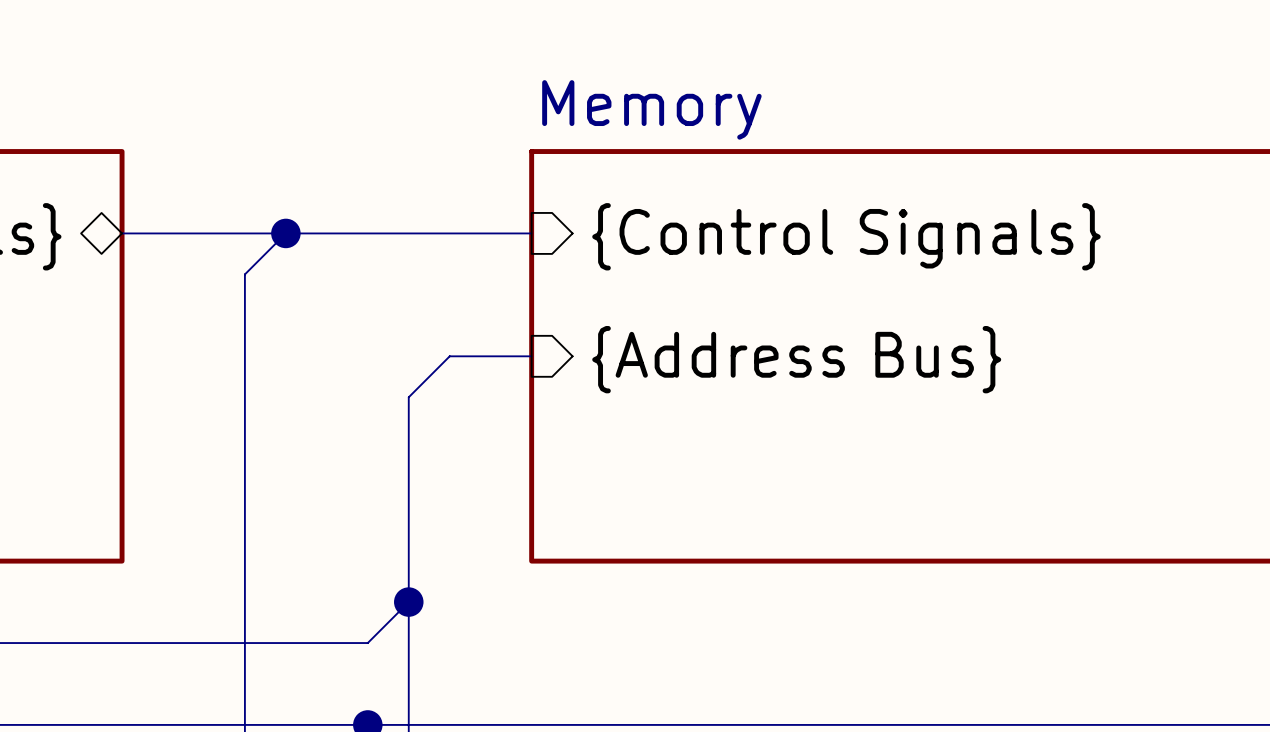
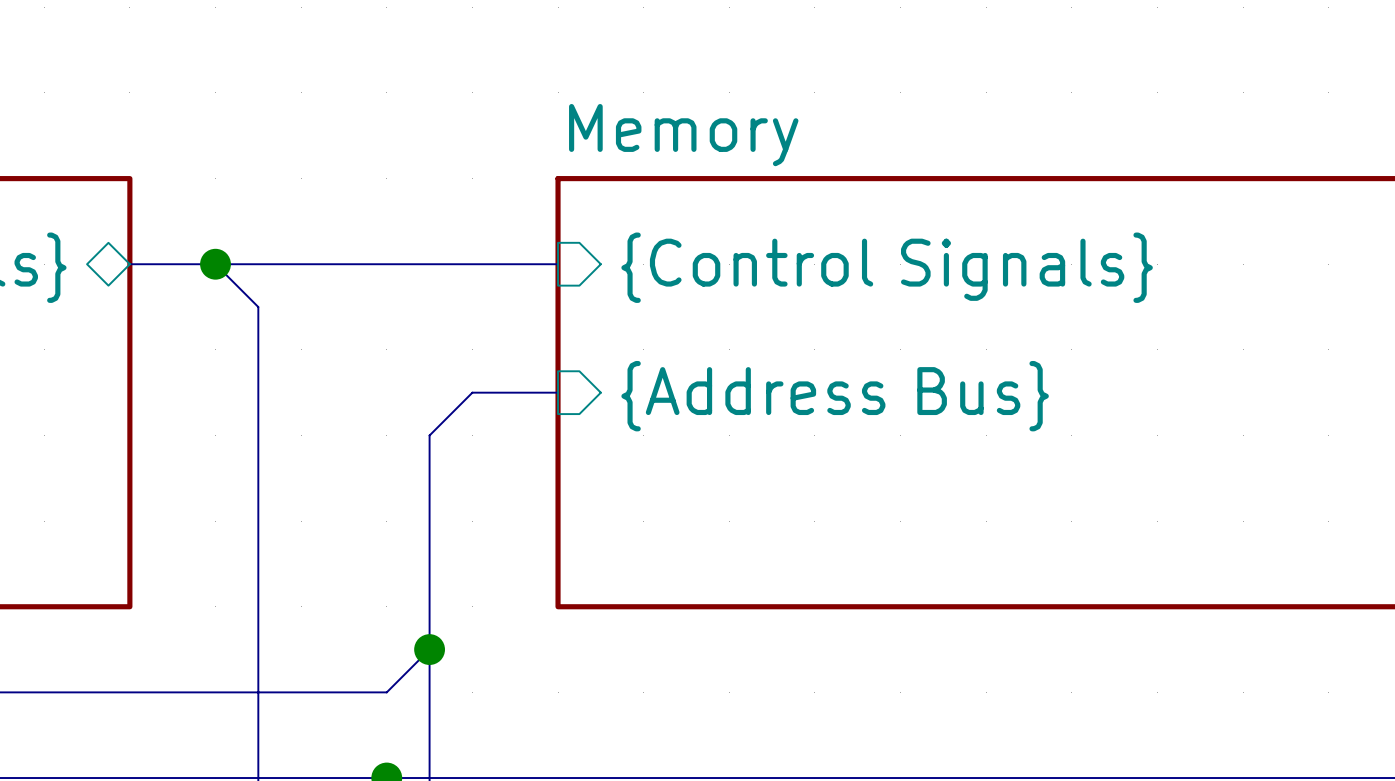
bus: (285, 233) (244, 274) -> (215, 264) (258, 307)
junction position: (285, 233) -> (215, 264)

